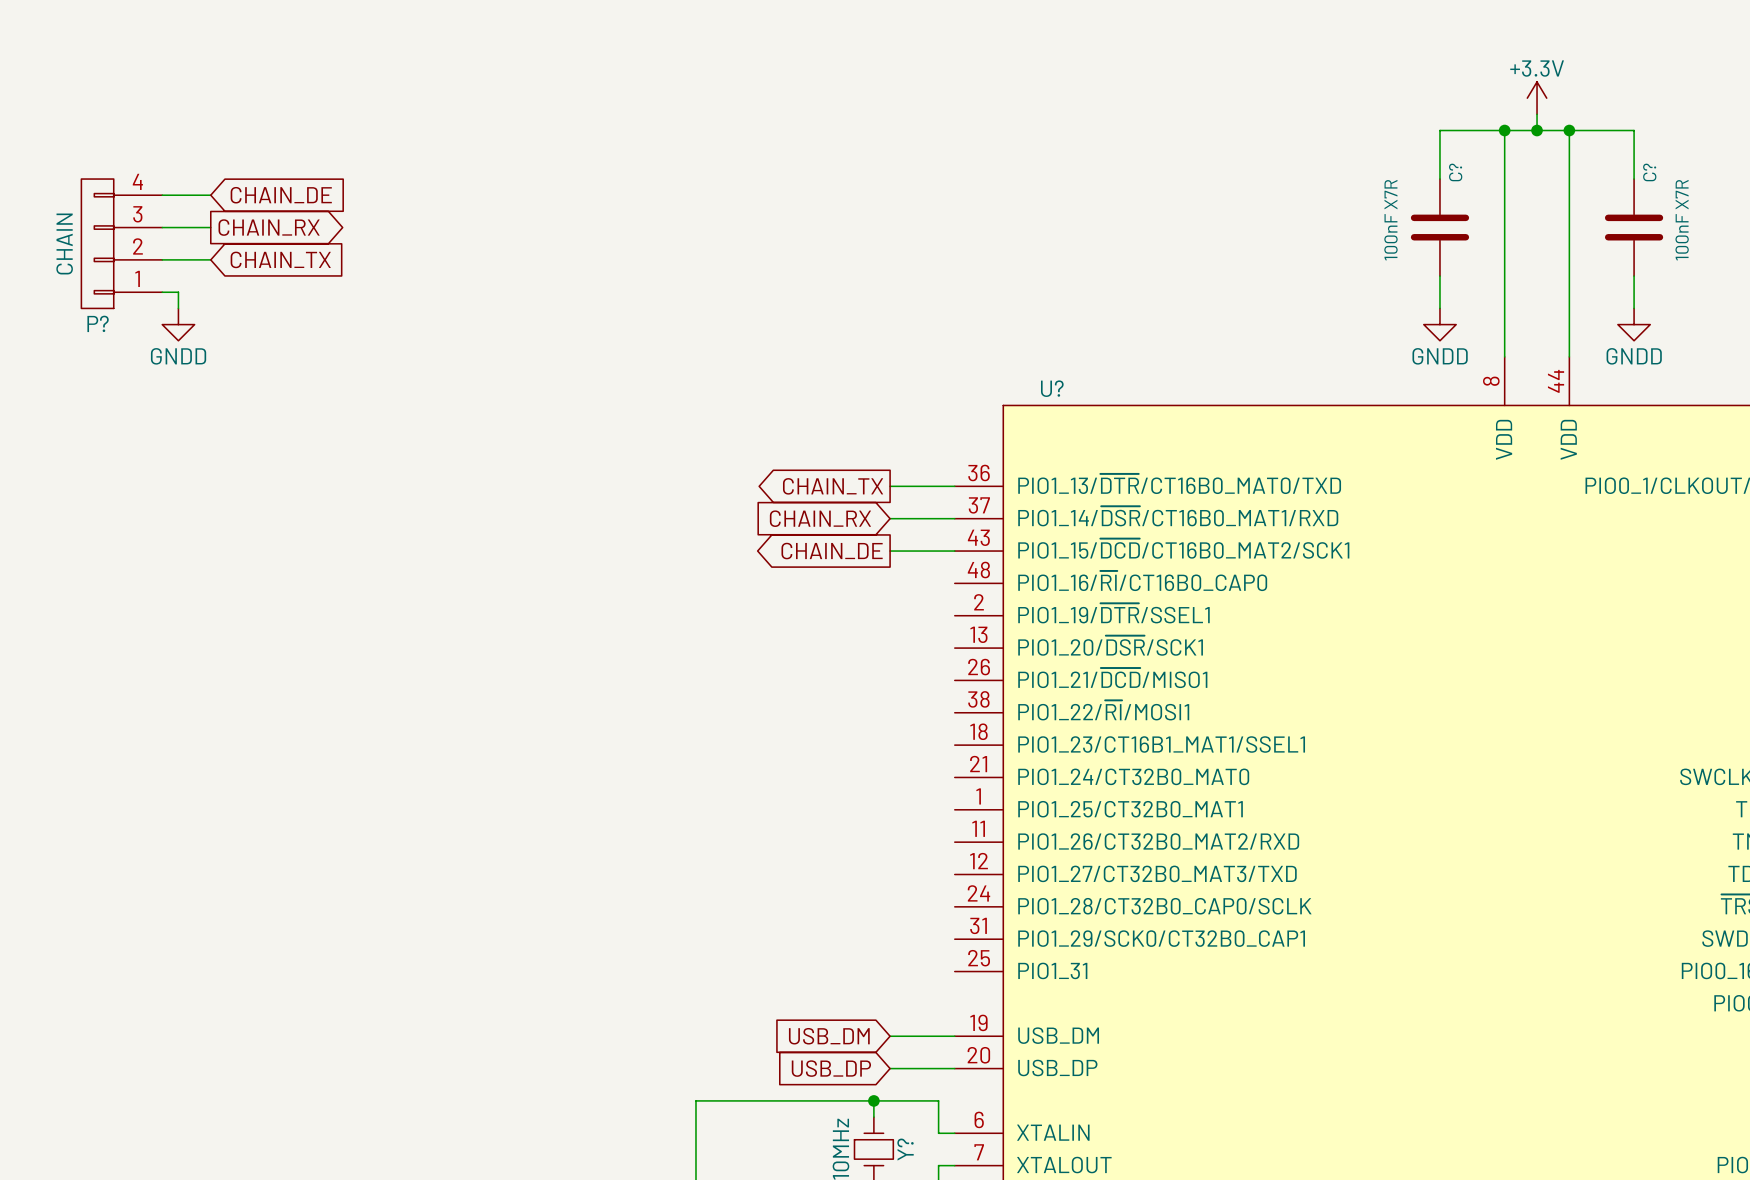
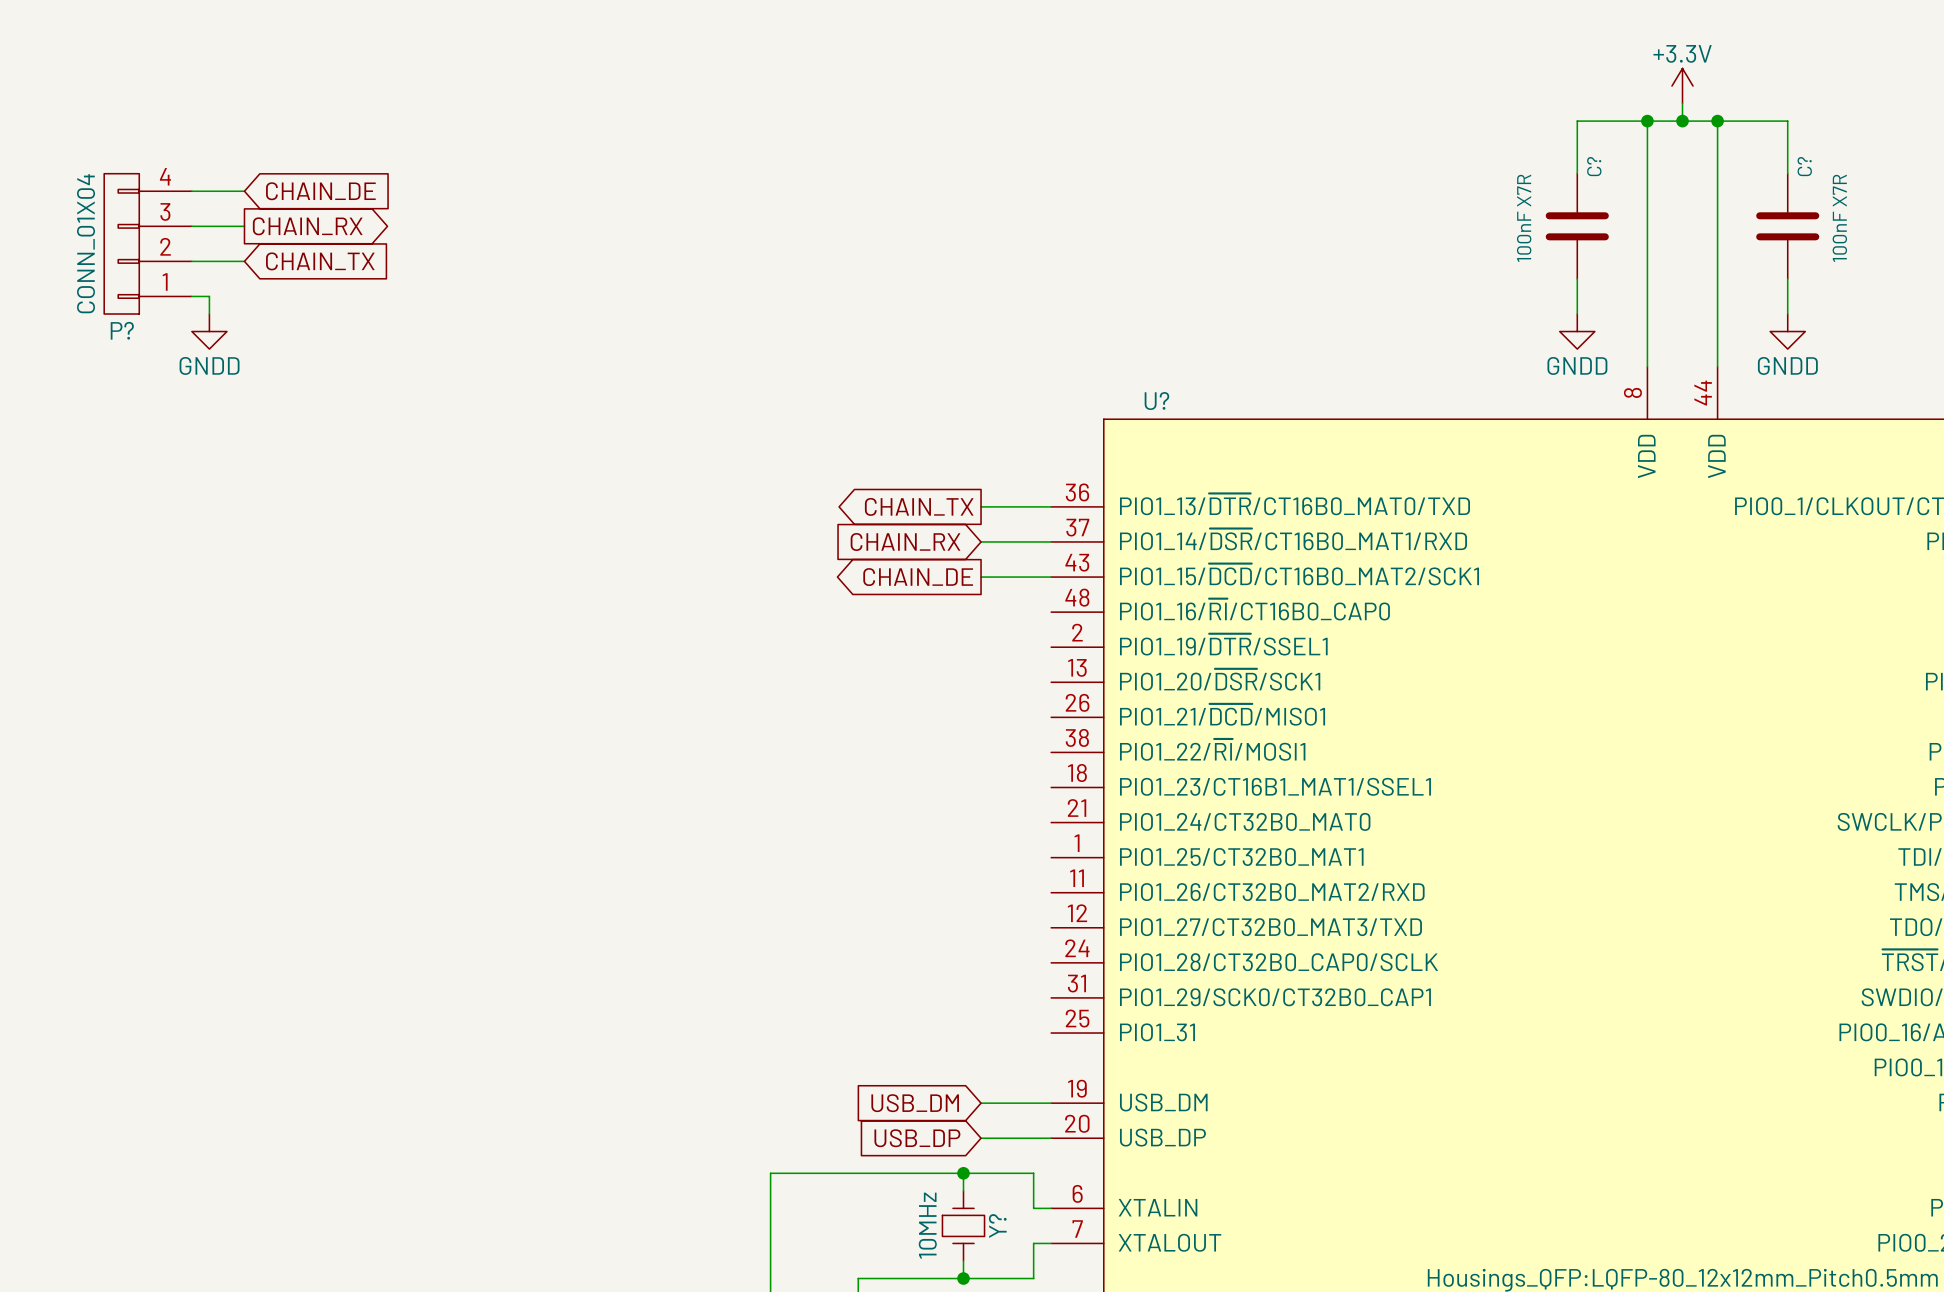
P? value: CHAIN (64, 243) -> CONN_01X04 (86, 243)

